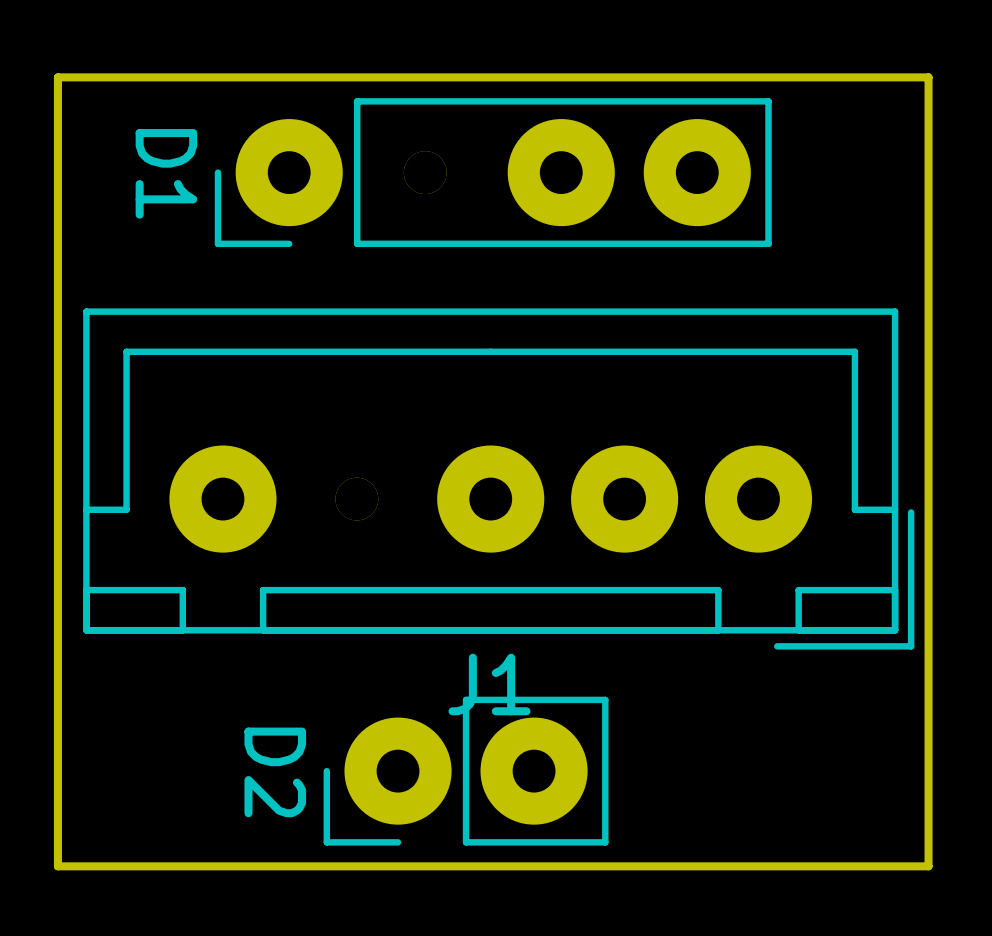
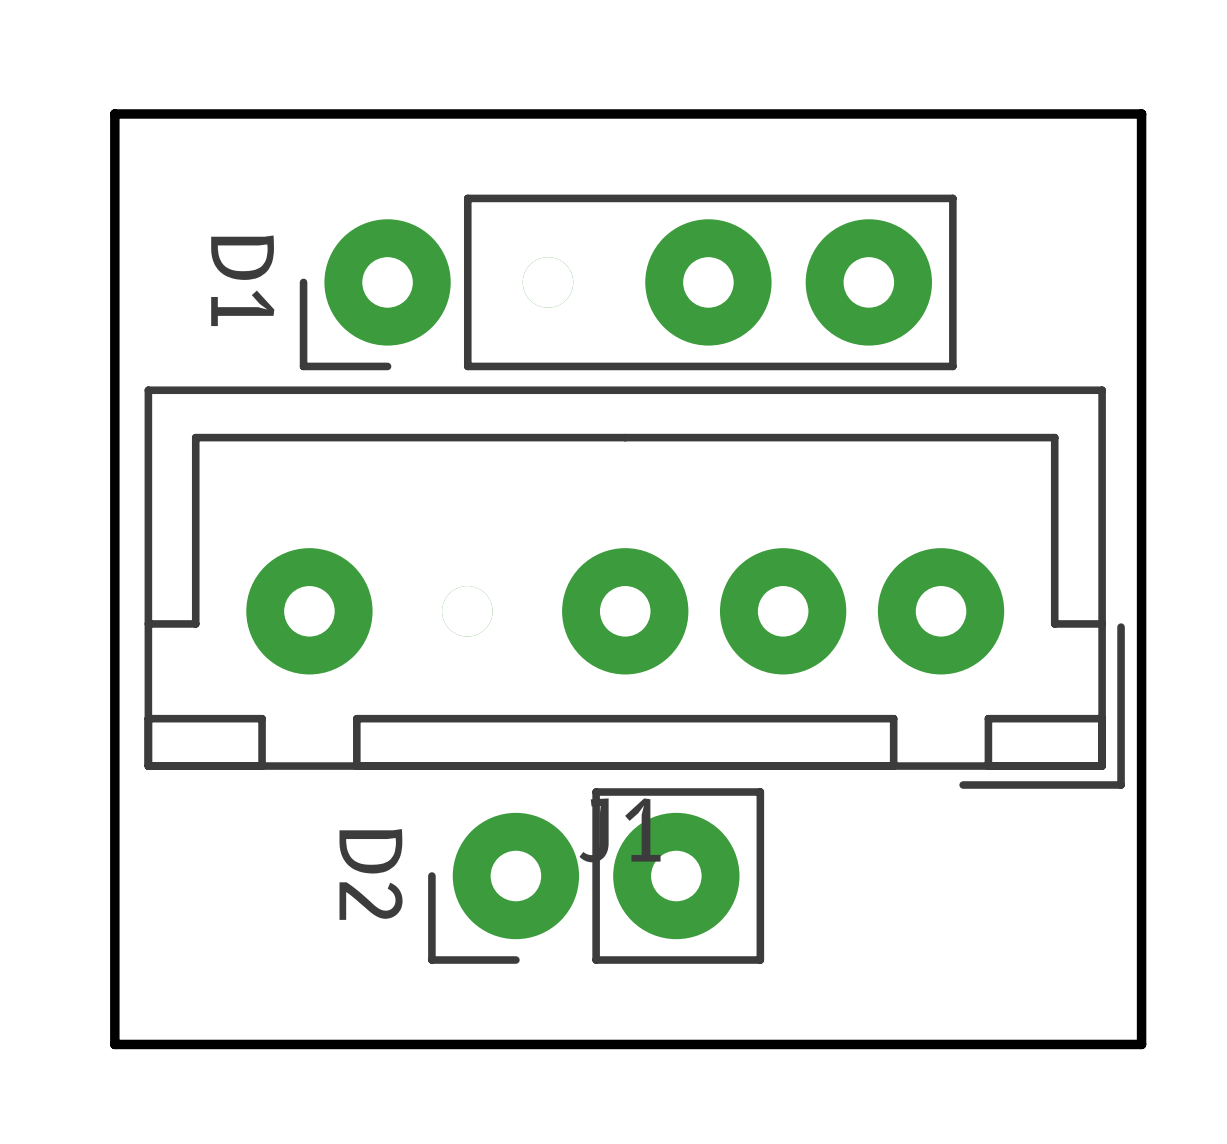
D1 position: (493, 172) -> (628, 282)
D2 position: (466, 771) -> (596, 876)

